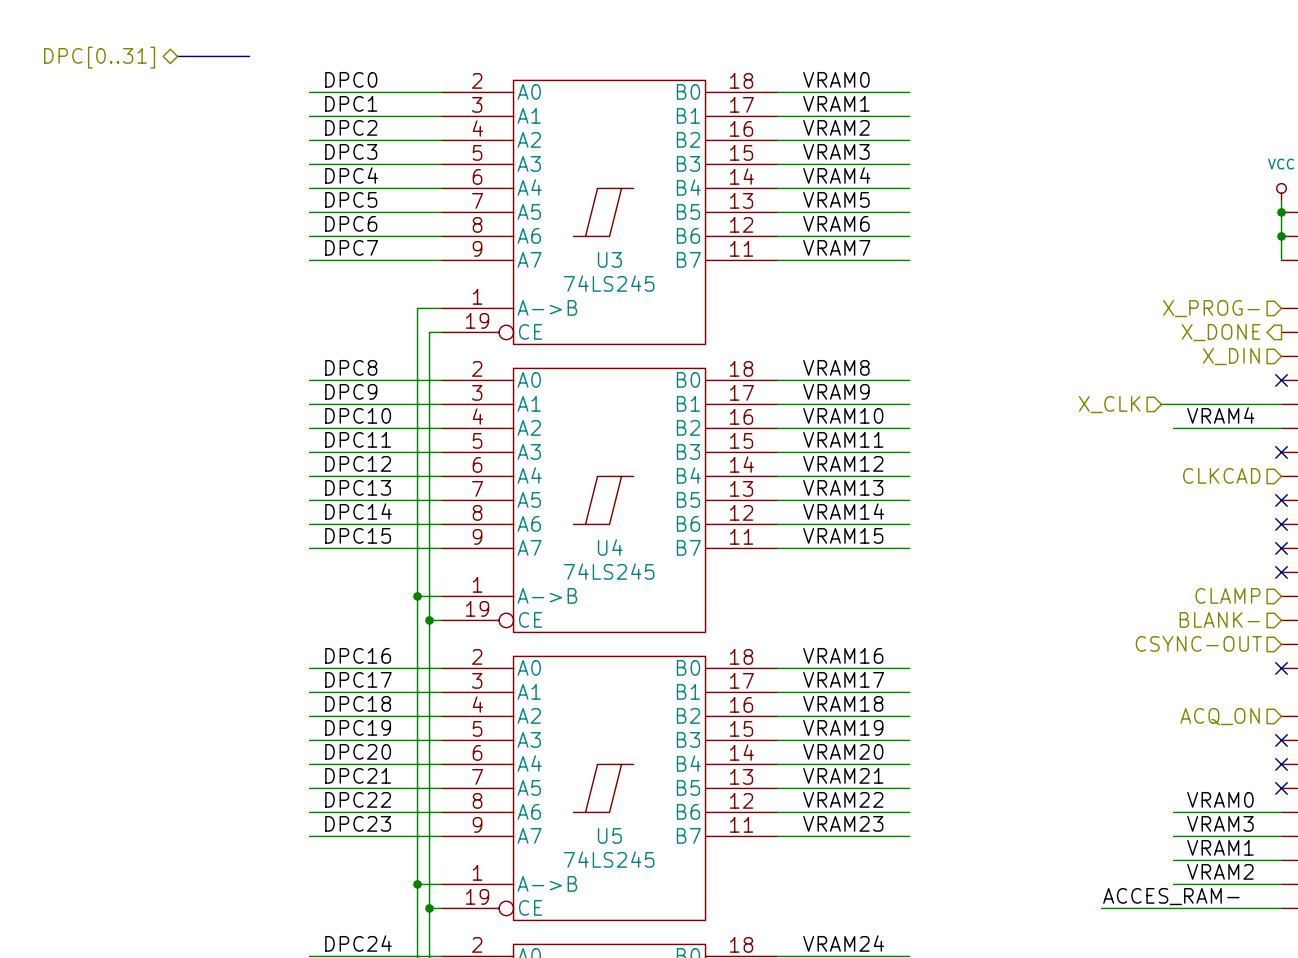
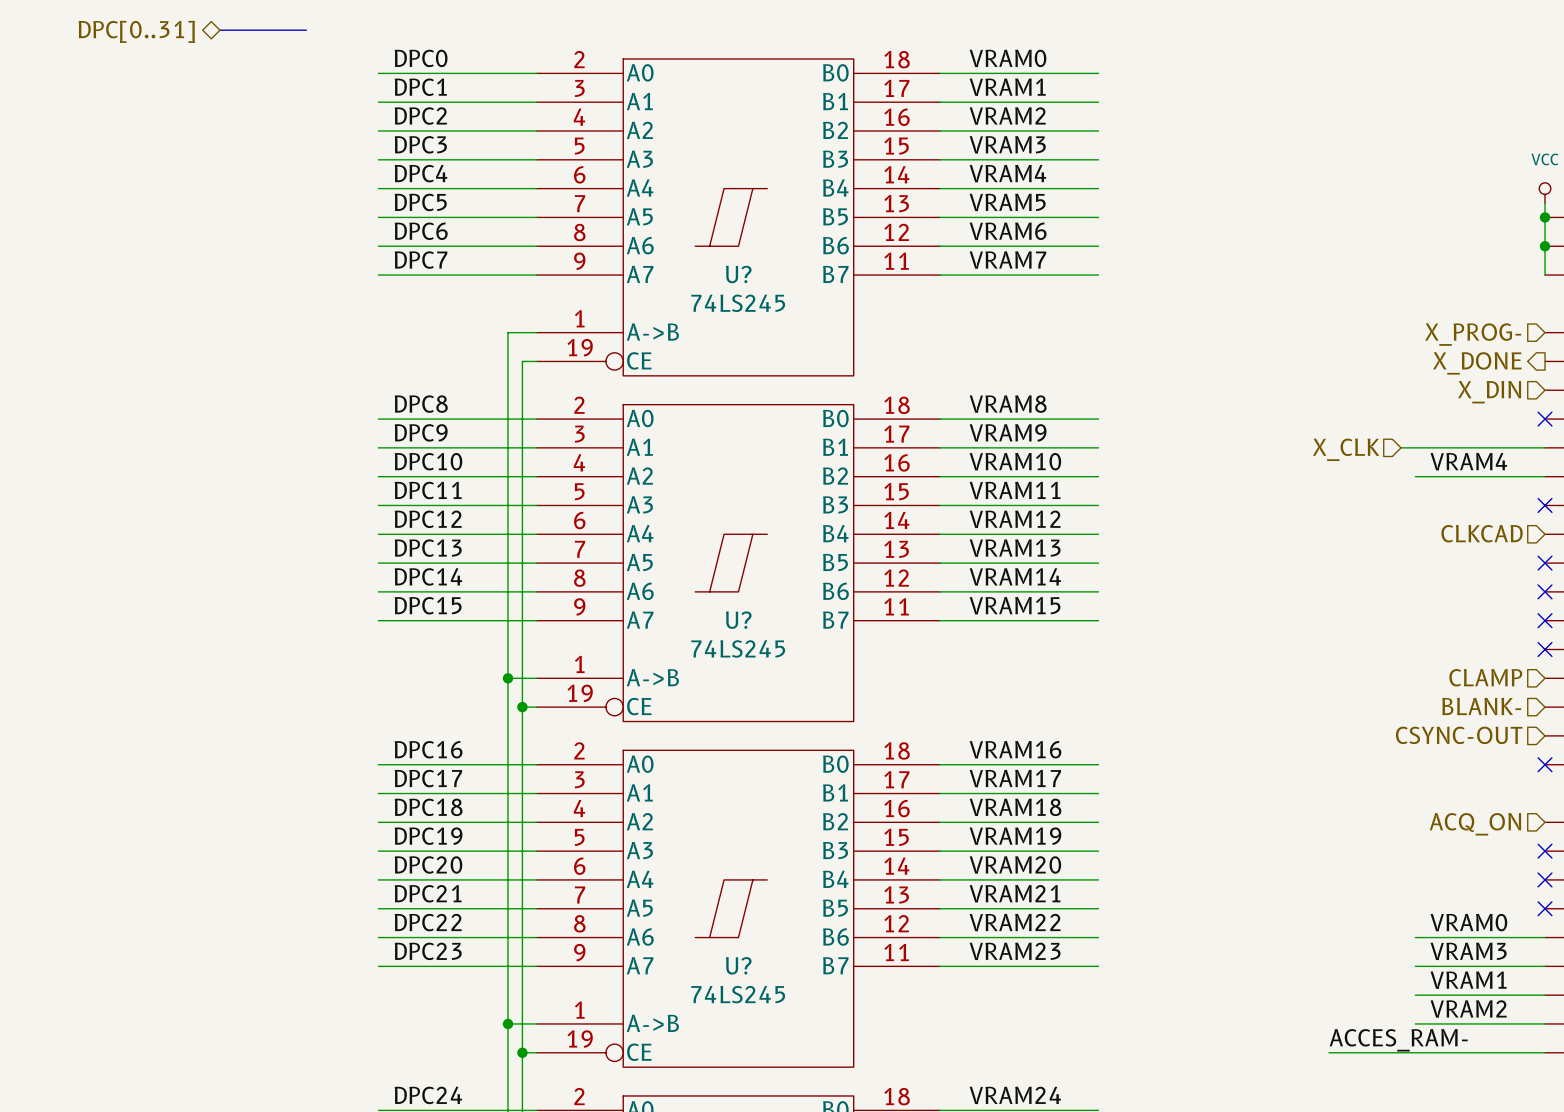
U3 name: U3 (609, 259) -> U? (738, 274)
U4 name: U4 (610, 547) -> U? (738, 620)
U5 name: U5 (609, 835) -> U? (738, 965)

